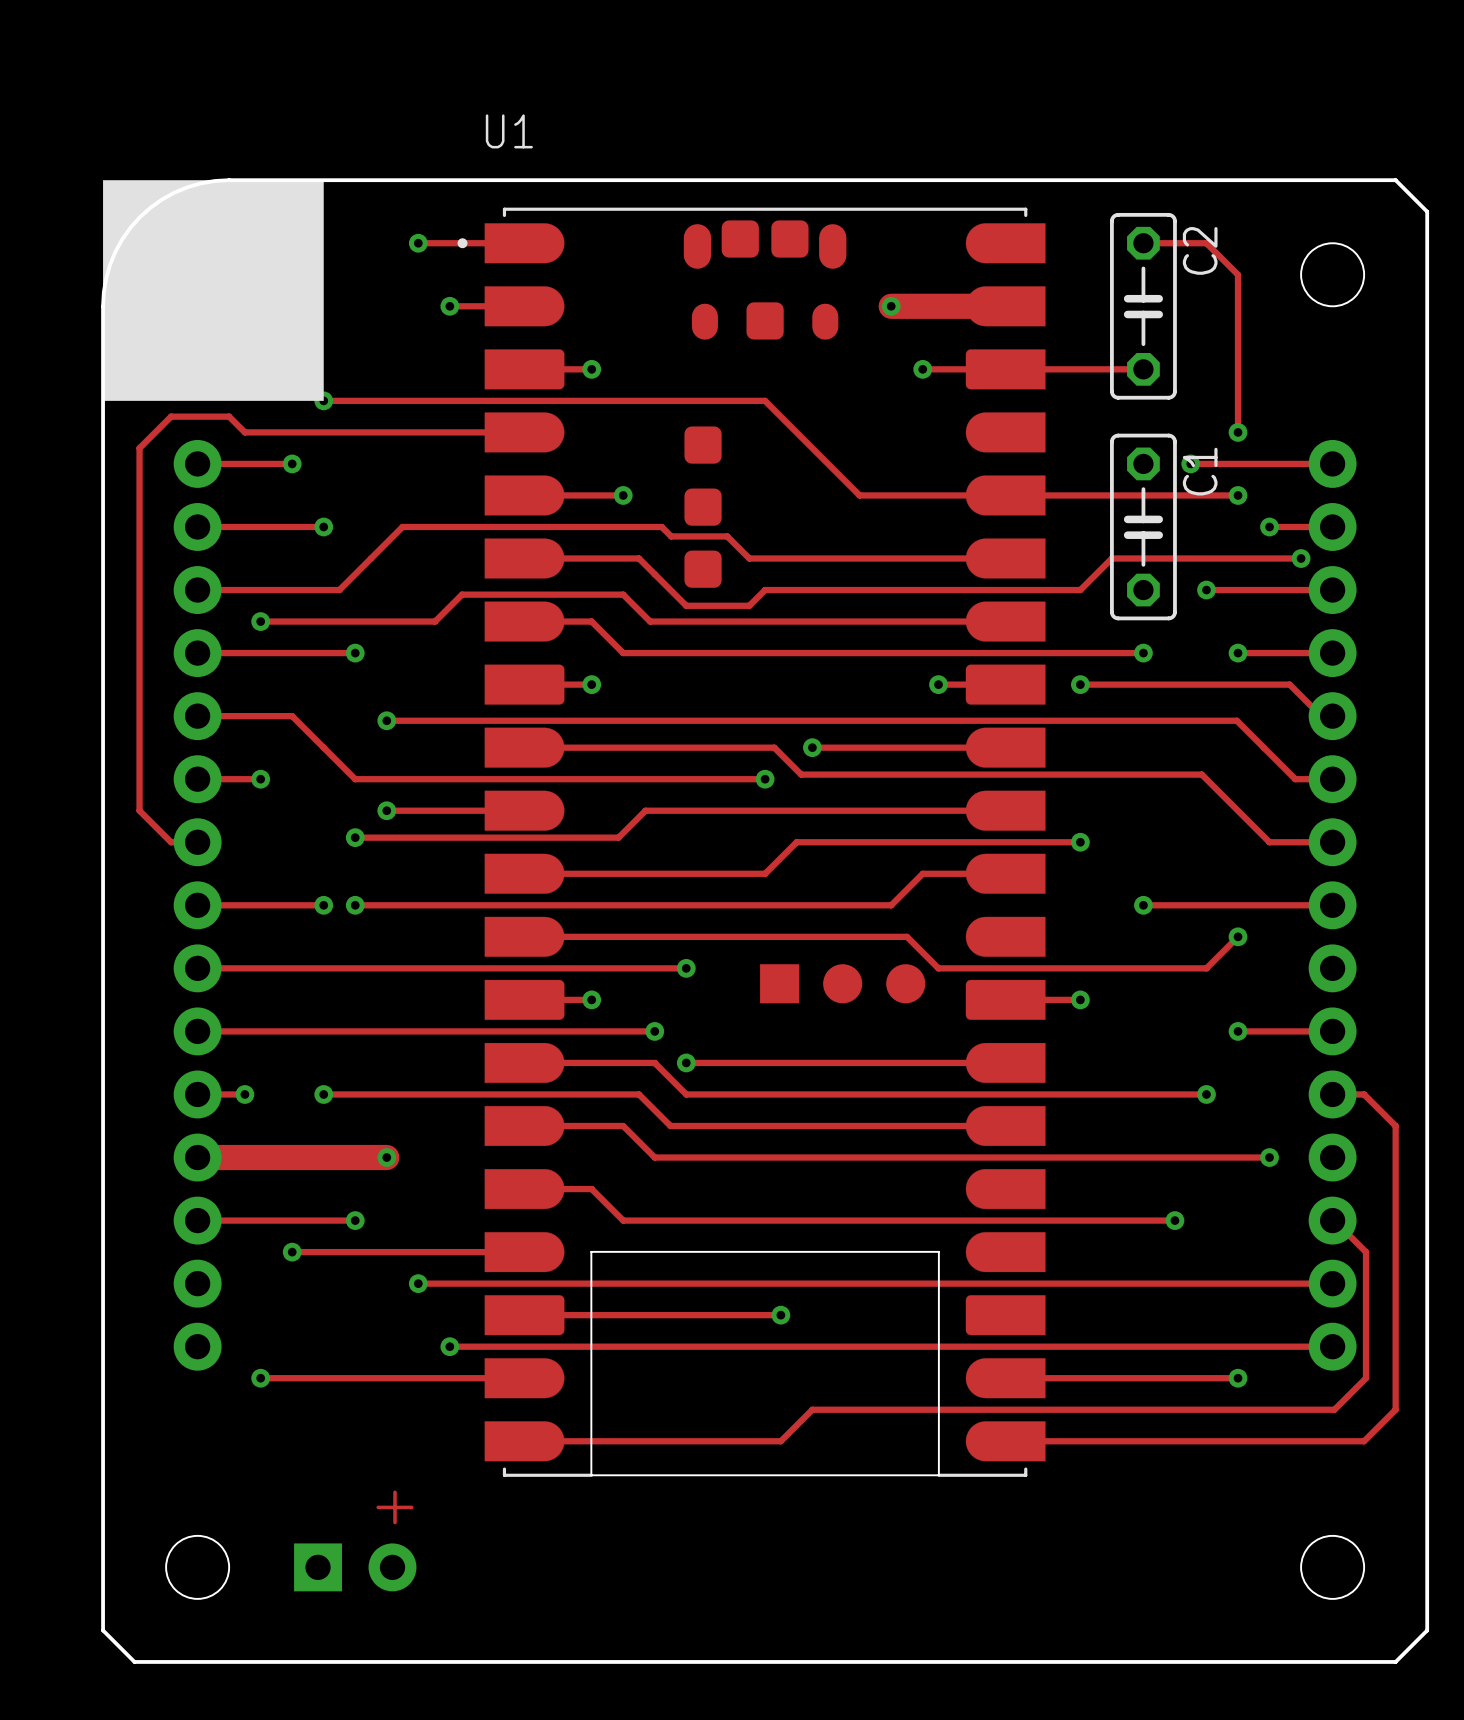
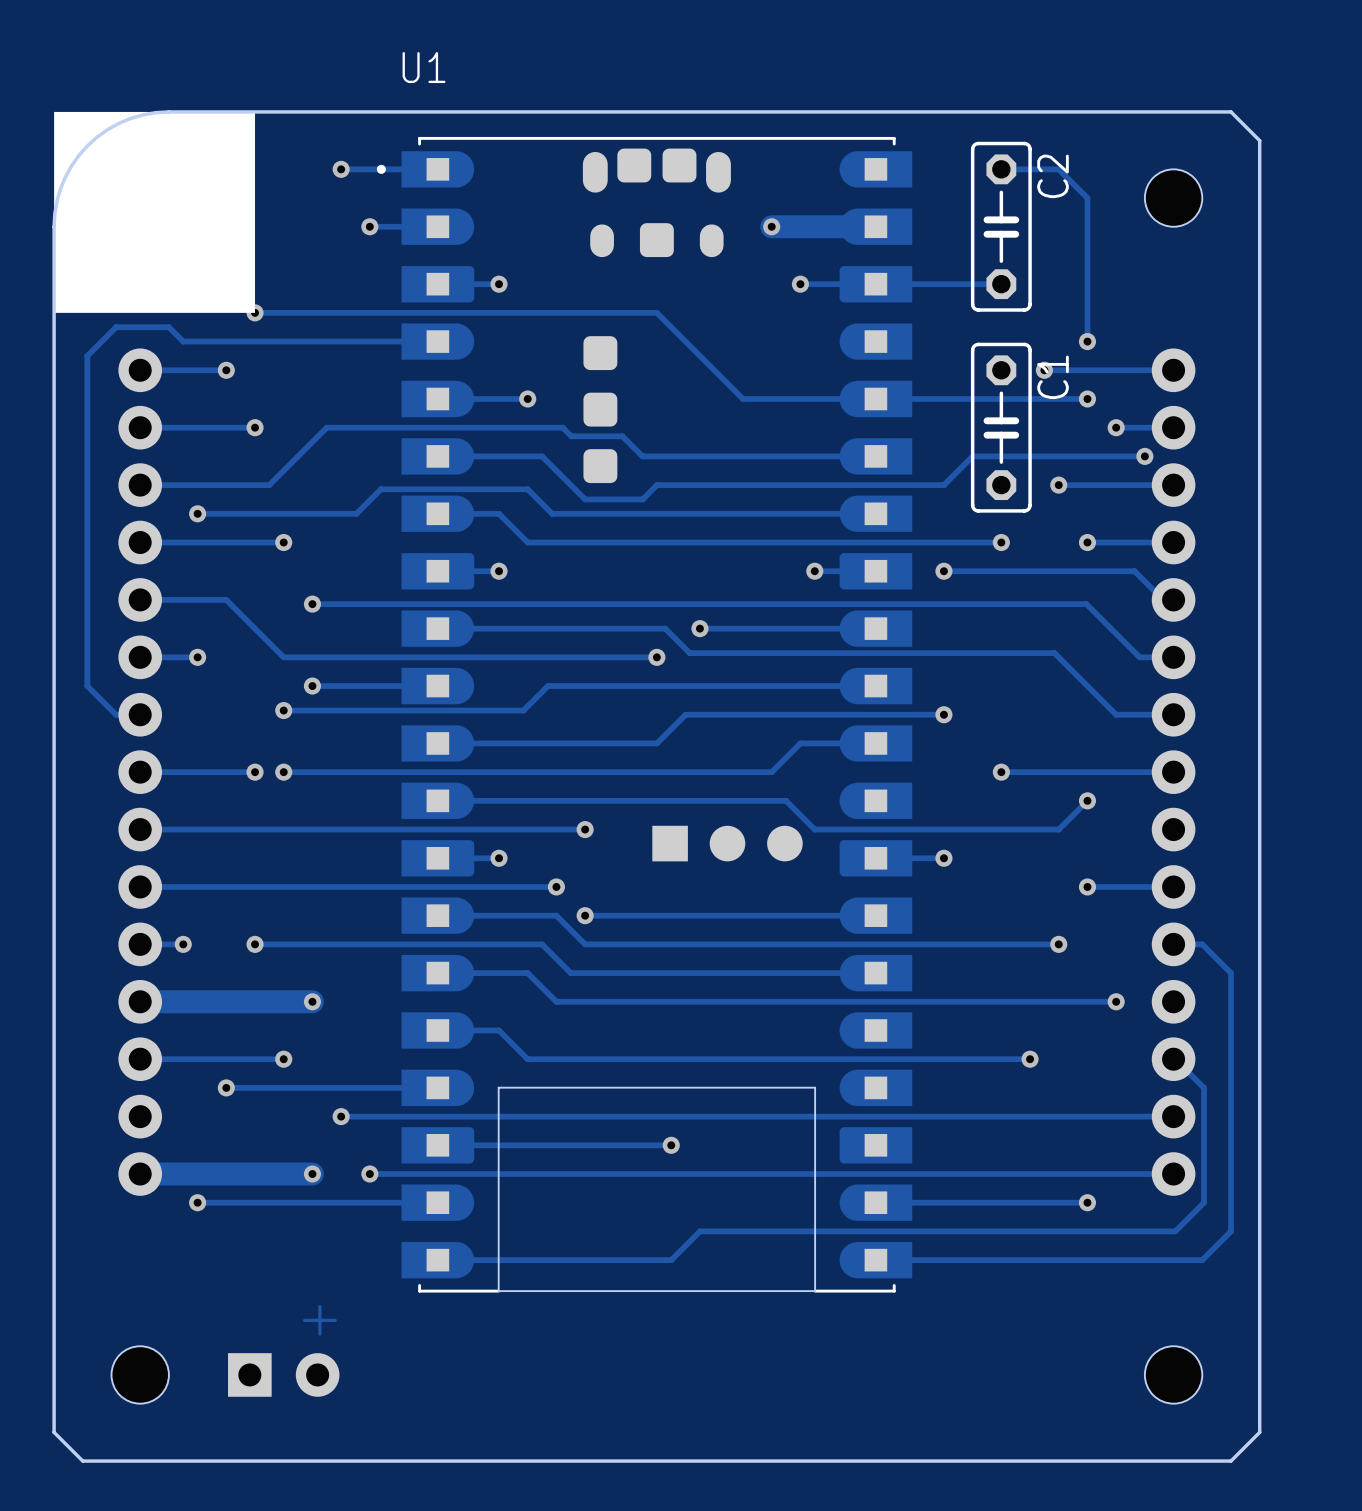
track: none -> (140, 1174) (312, 1174)
via: none -> (312, 1174)

